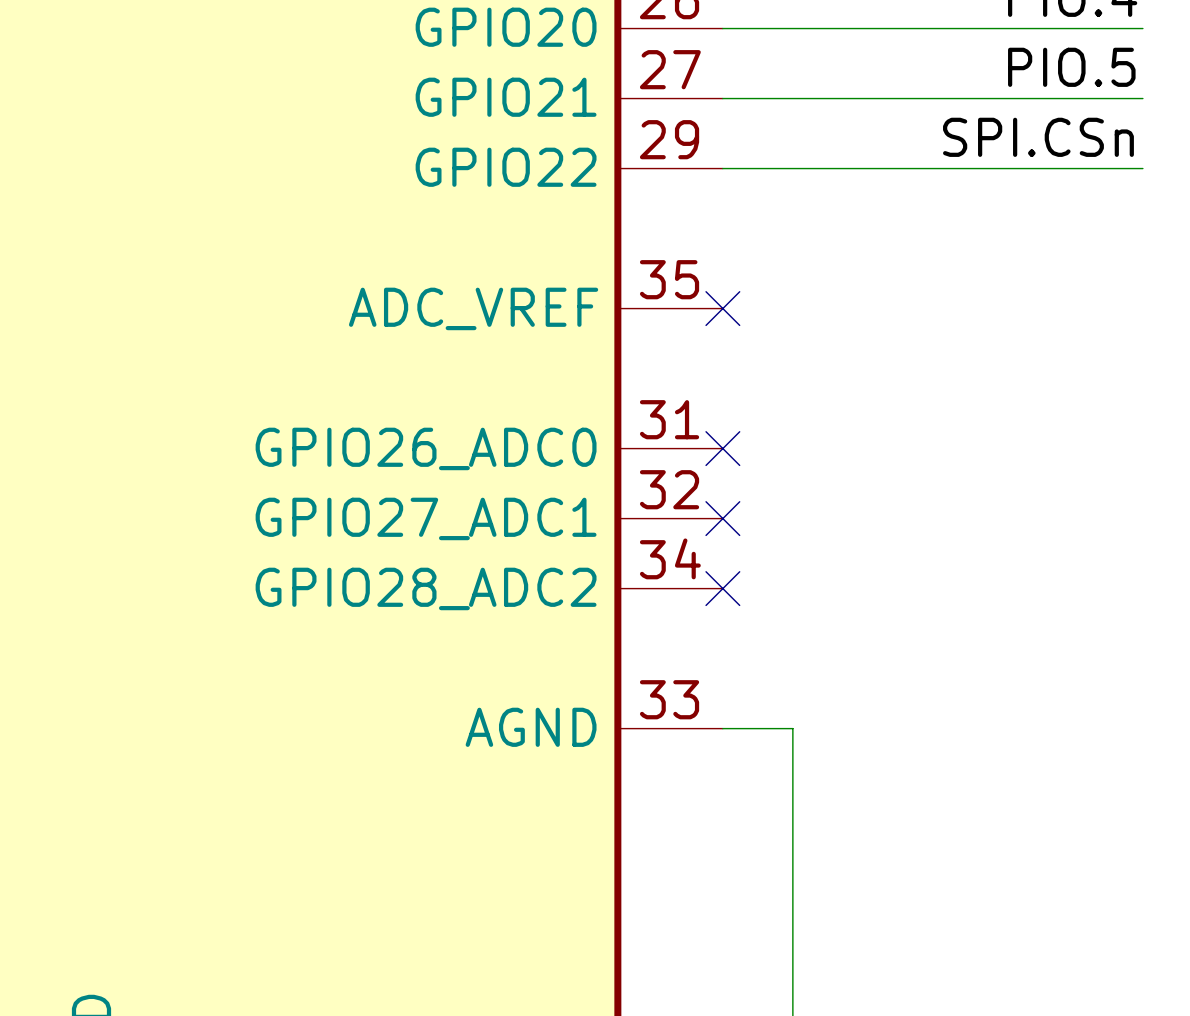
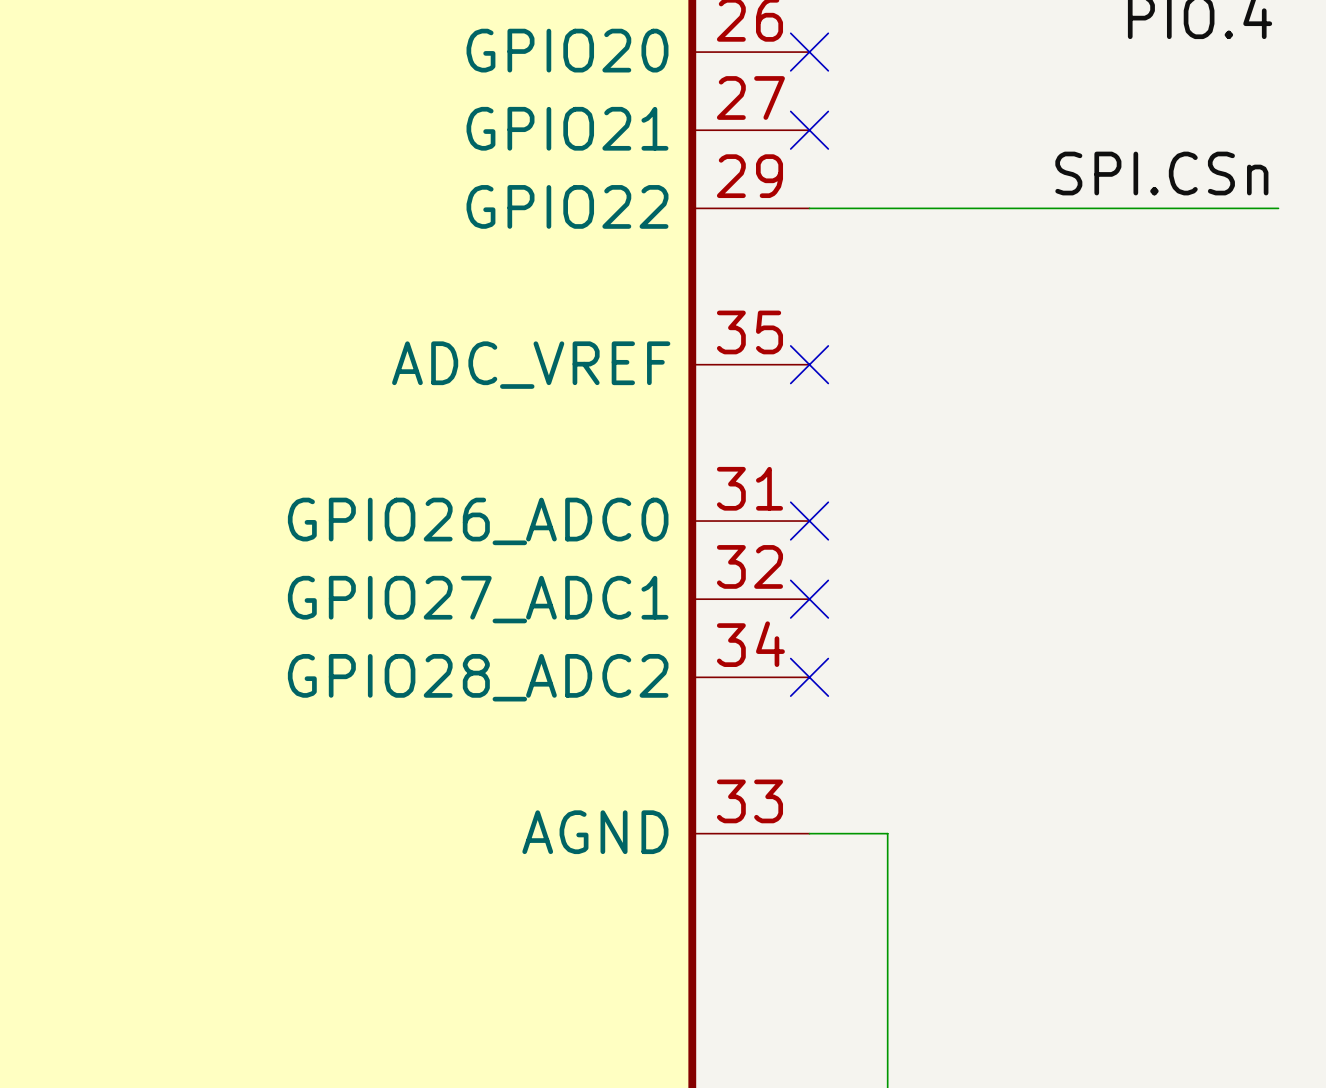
wire: (722, 28) (1142, 28) -> none
no-connect mark: none -> (809, 52)
label: PIO.5 (1071, 67) -> none
wire: (722, 98) (1142, 98) -> none
no-connect mark: none -> (809, 130)

